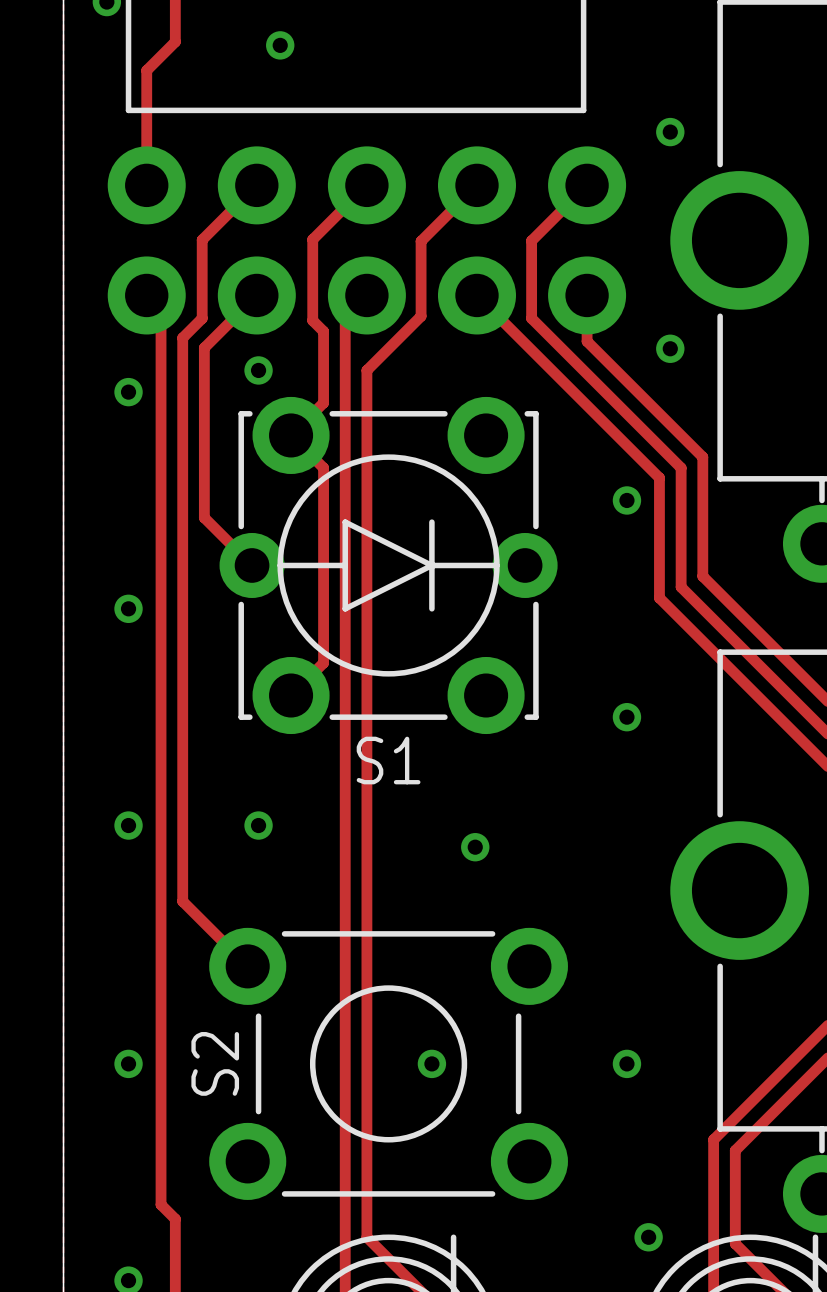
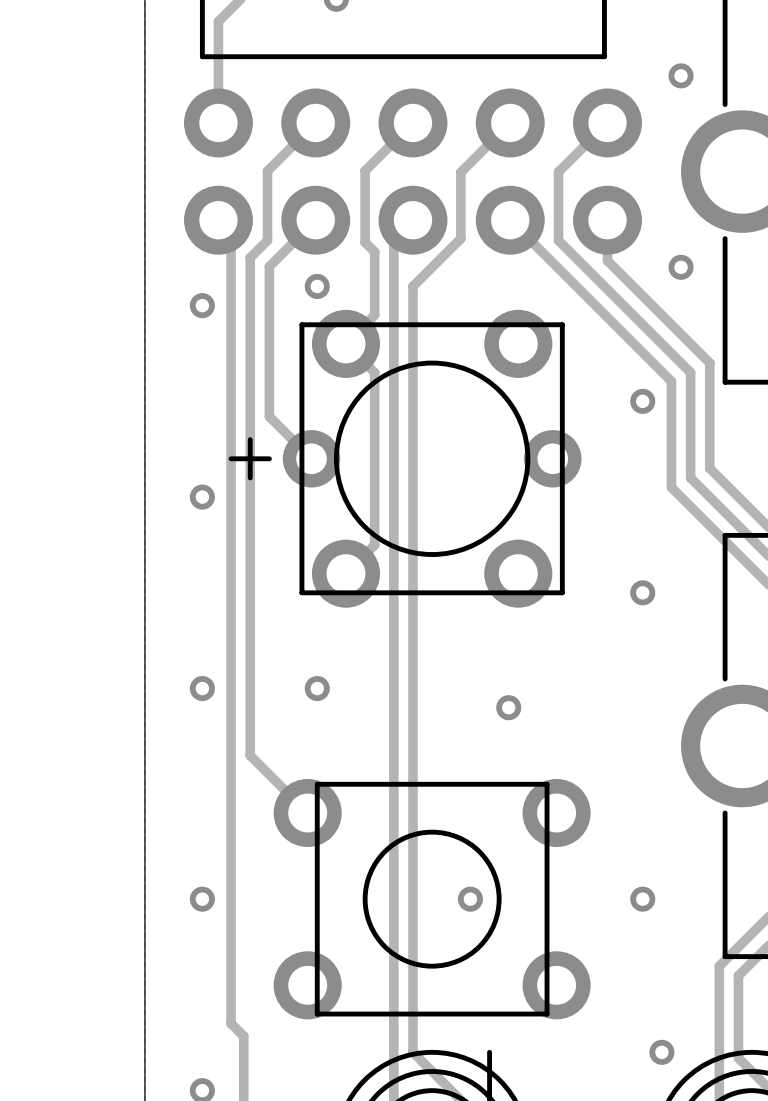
part: none -> (405, 458)
S1: (388, 565) -> none
S2: (388, 1063) -> none
part: none -> (432, 899)

